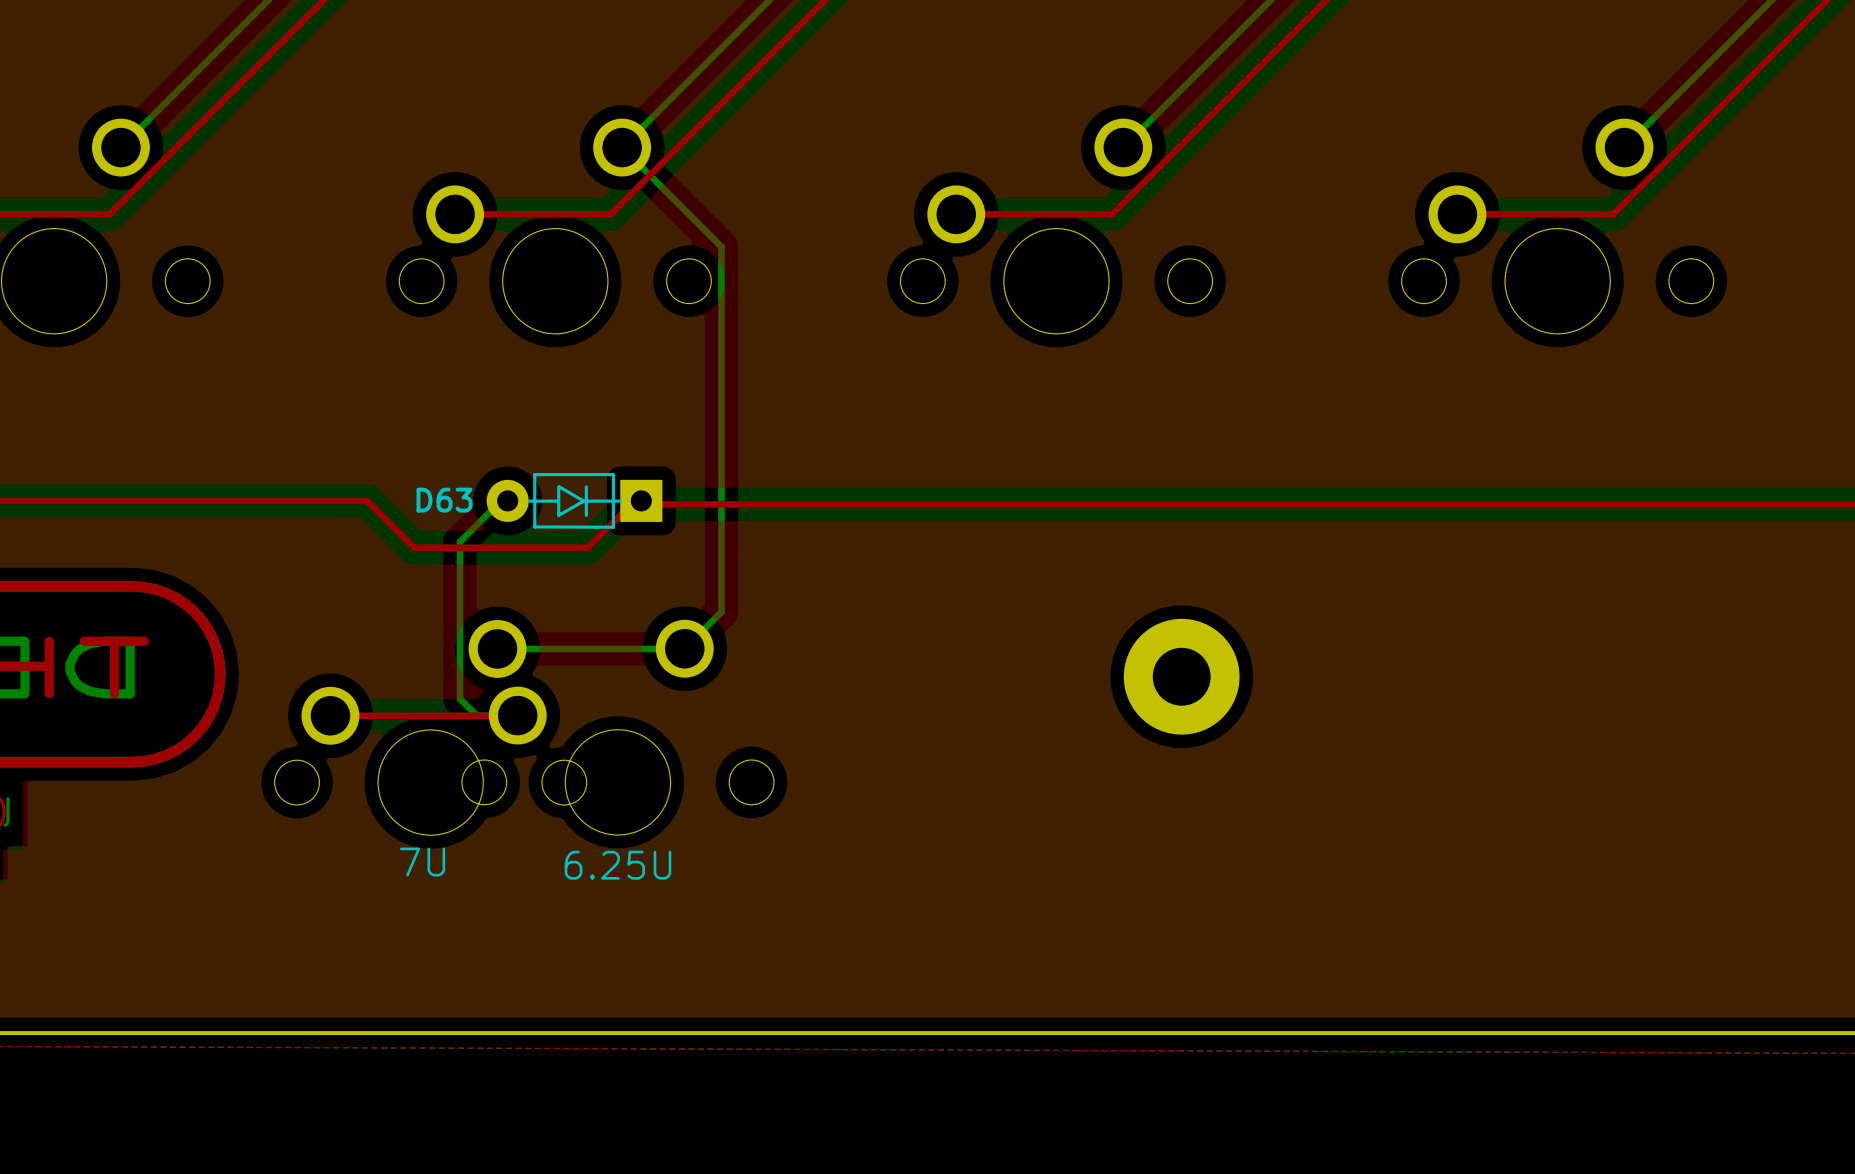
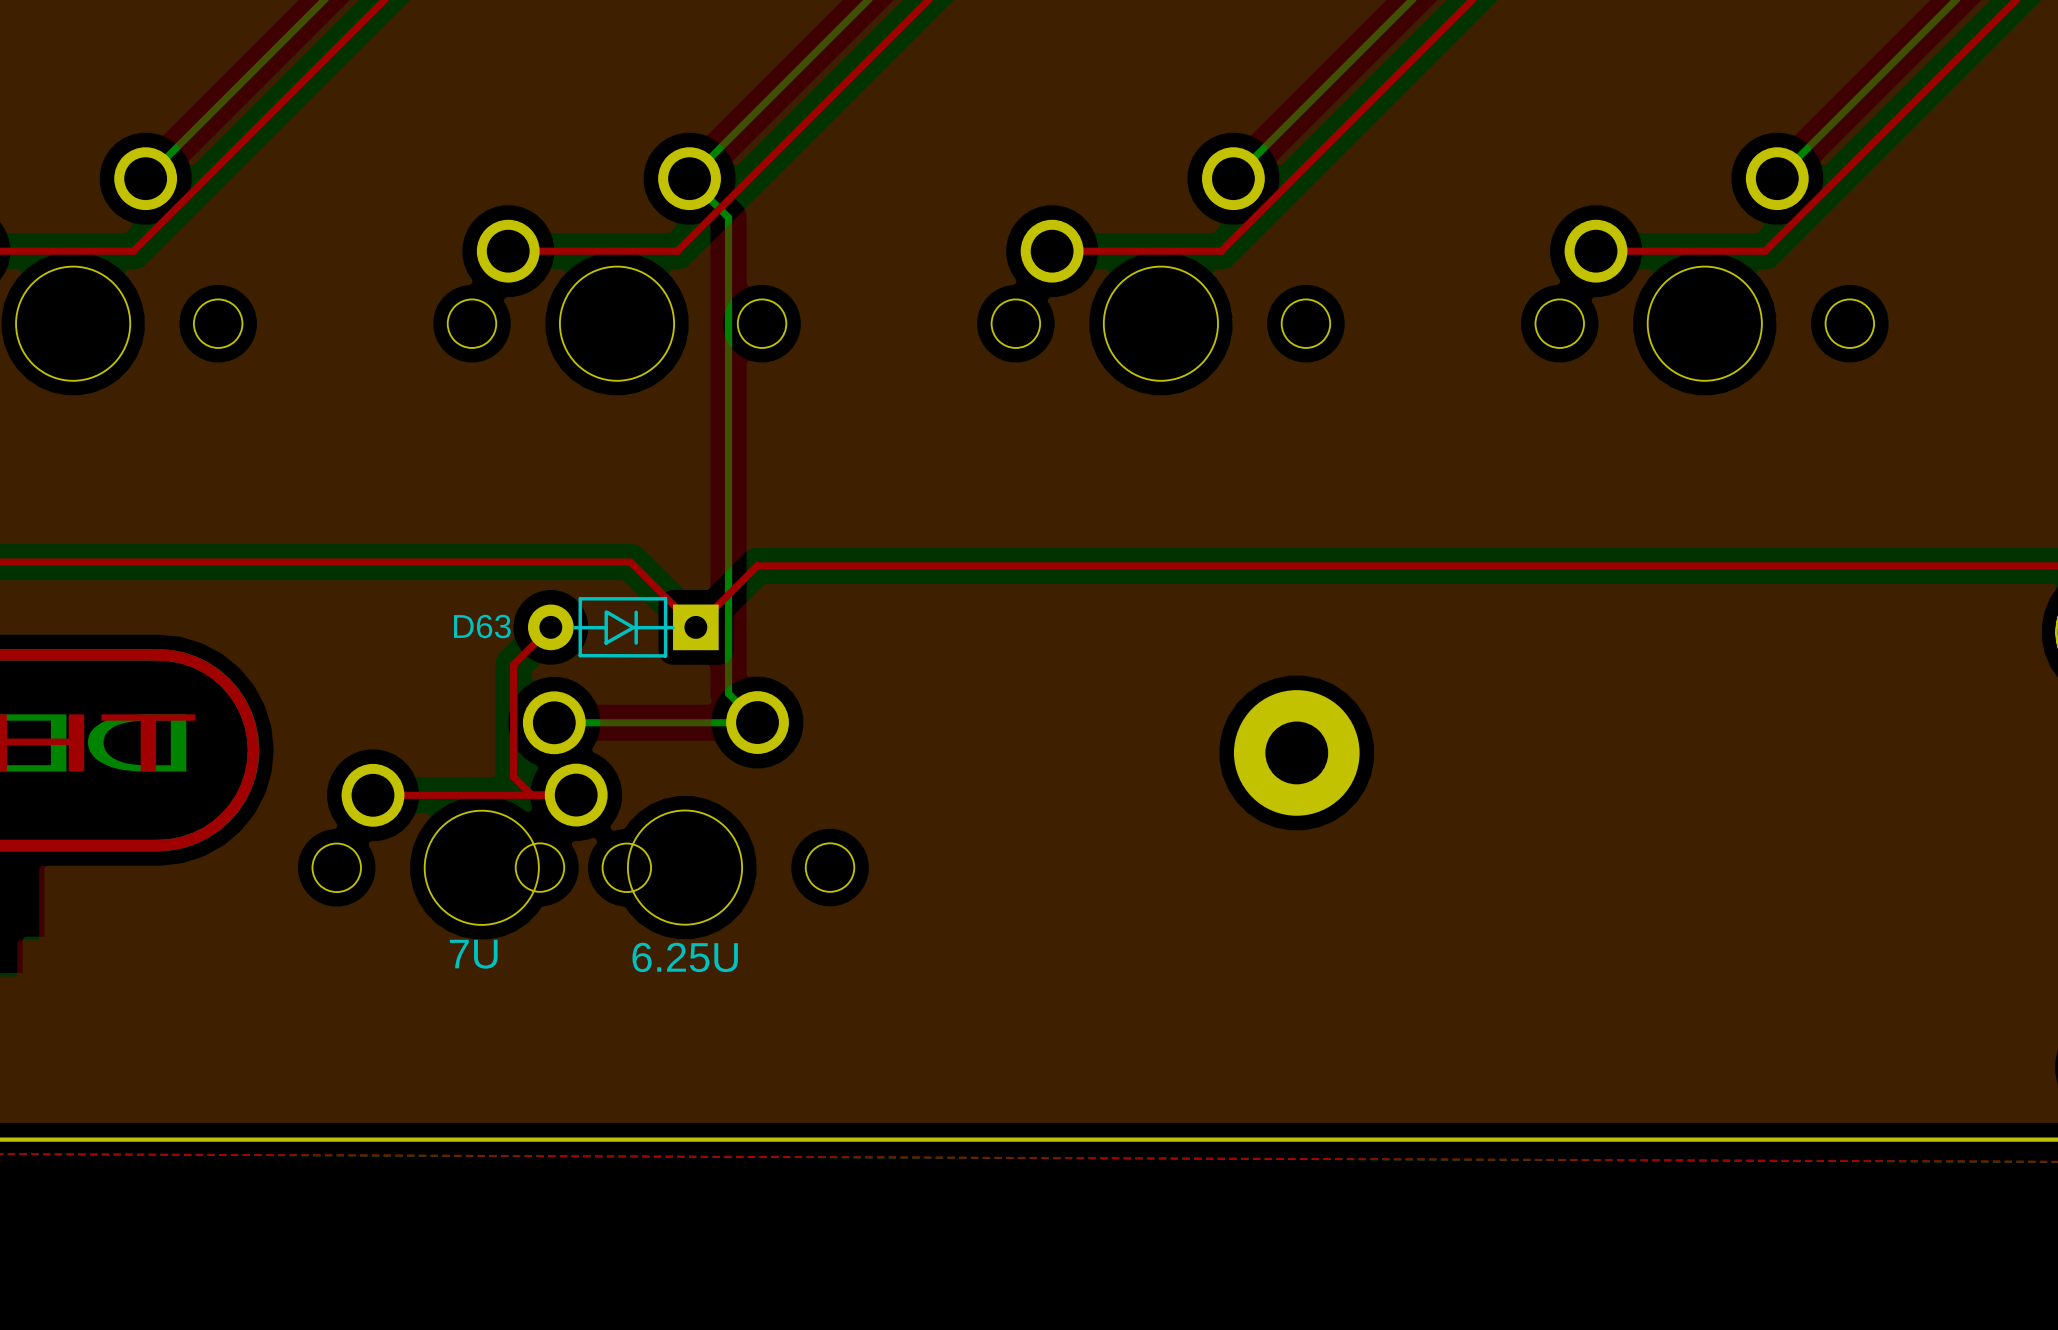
bottom track: (658, 183) (721, 246) (721, 612) (684, 648) -> (728, 217) (728, 693) (757, 722)
bottom track: (507, 494) (460, 541) (460, 698) (476, 715) (517, 715) -> none
top track: (641, 494) (587, 547) (414, 547) (367, 500) -> (757, 565) (695, 627) (630, 562) (413, 562)
D63 position: (574, 500) -> (623, 627)
top track: (641, 500) (644, 504) (684, 504) -> none
top track: none -> (550, 627) (513, 664) (513, 776) (531, 795) (576, 795)

